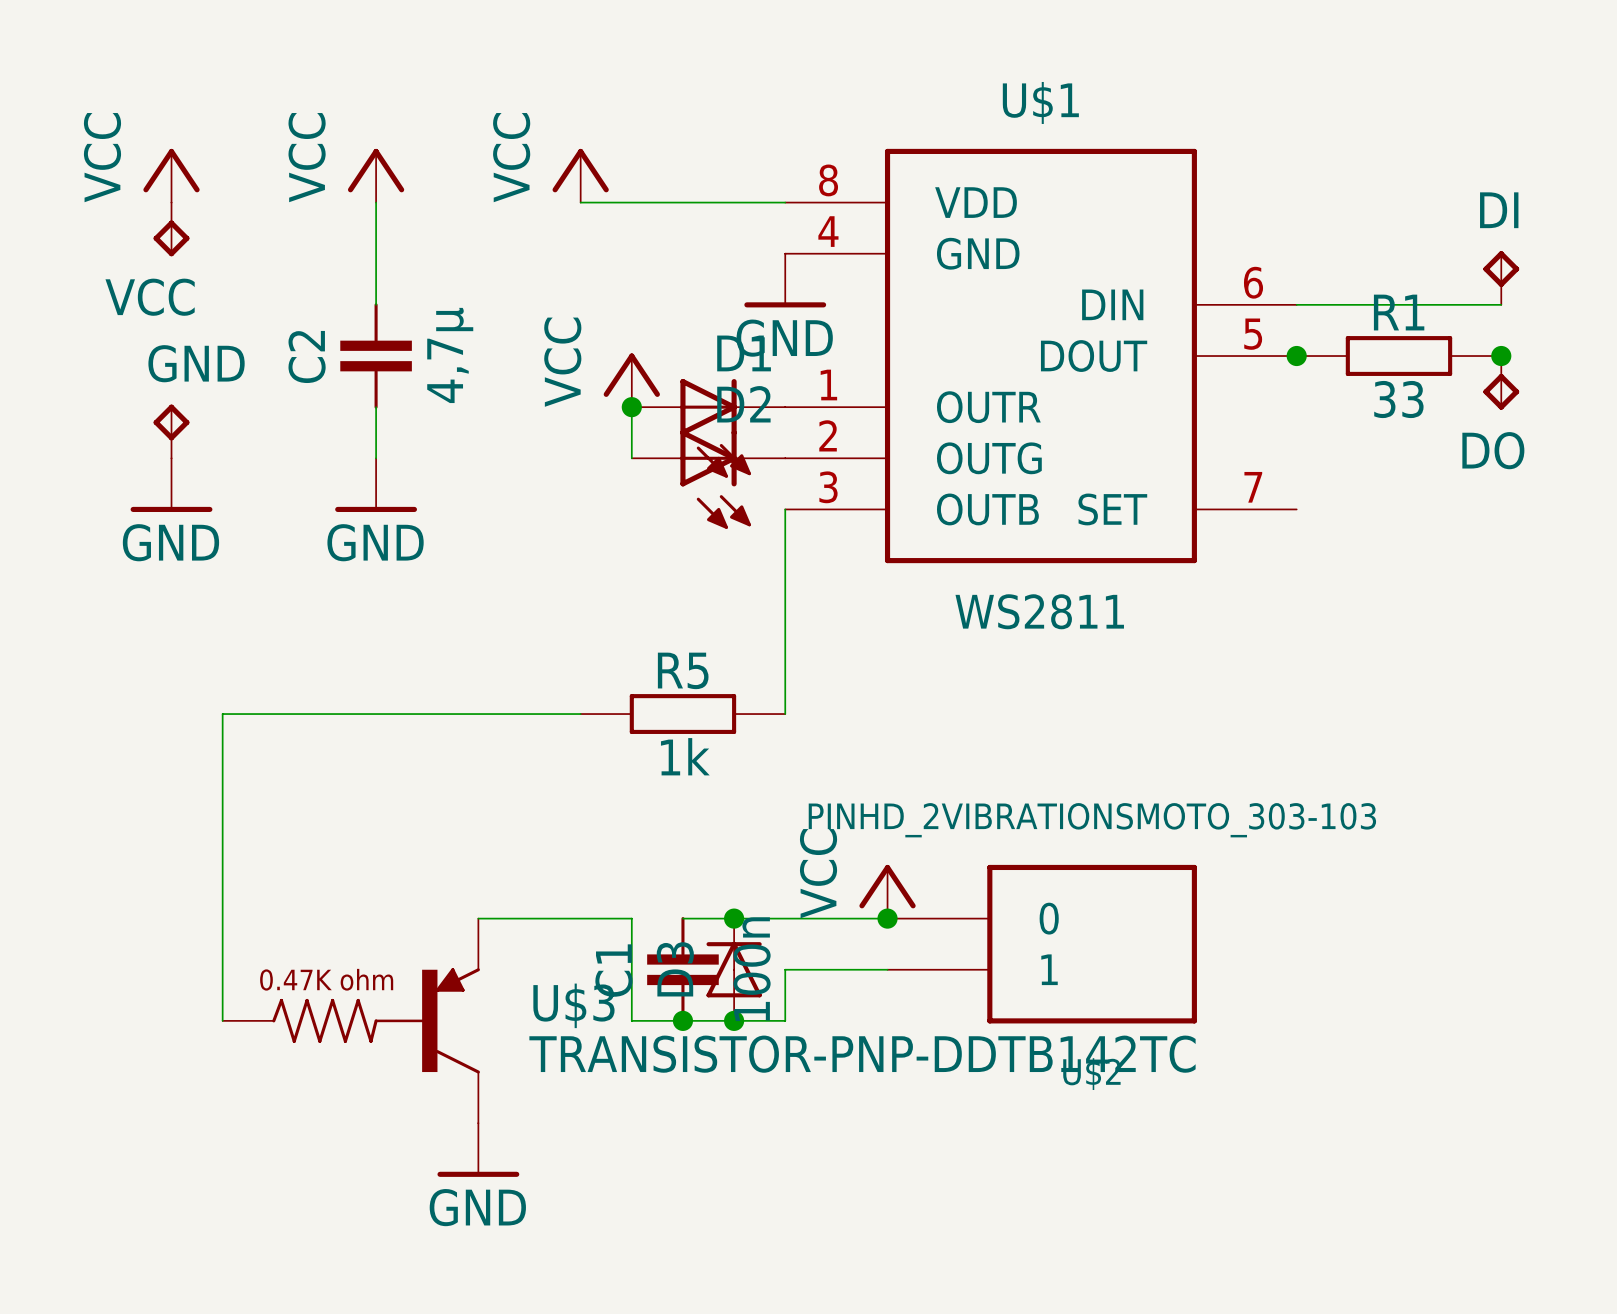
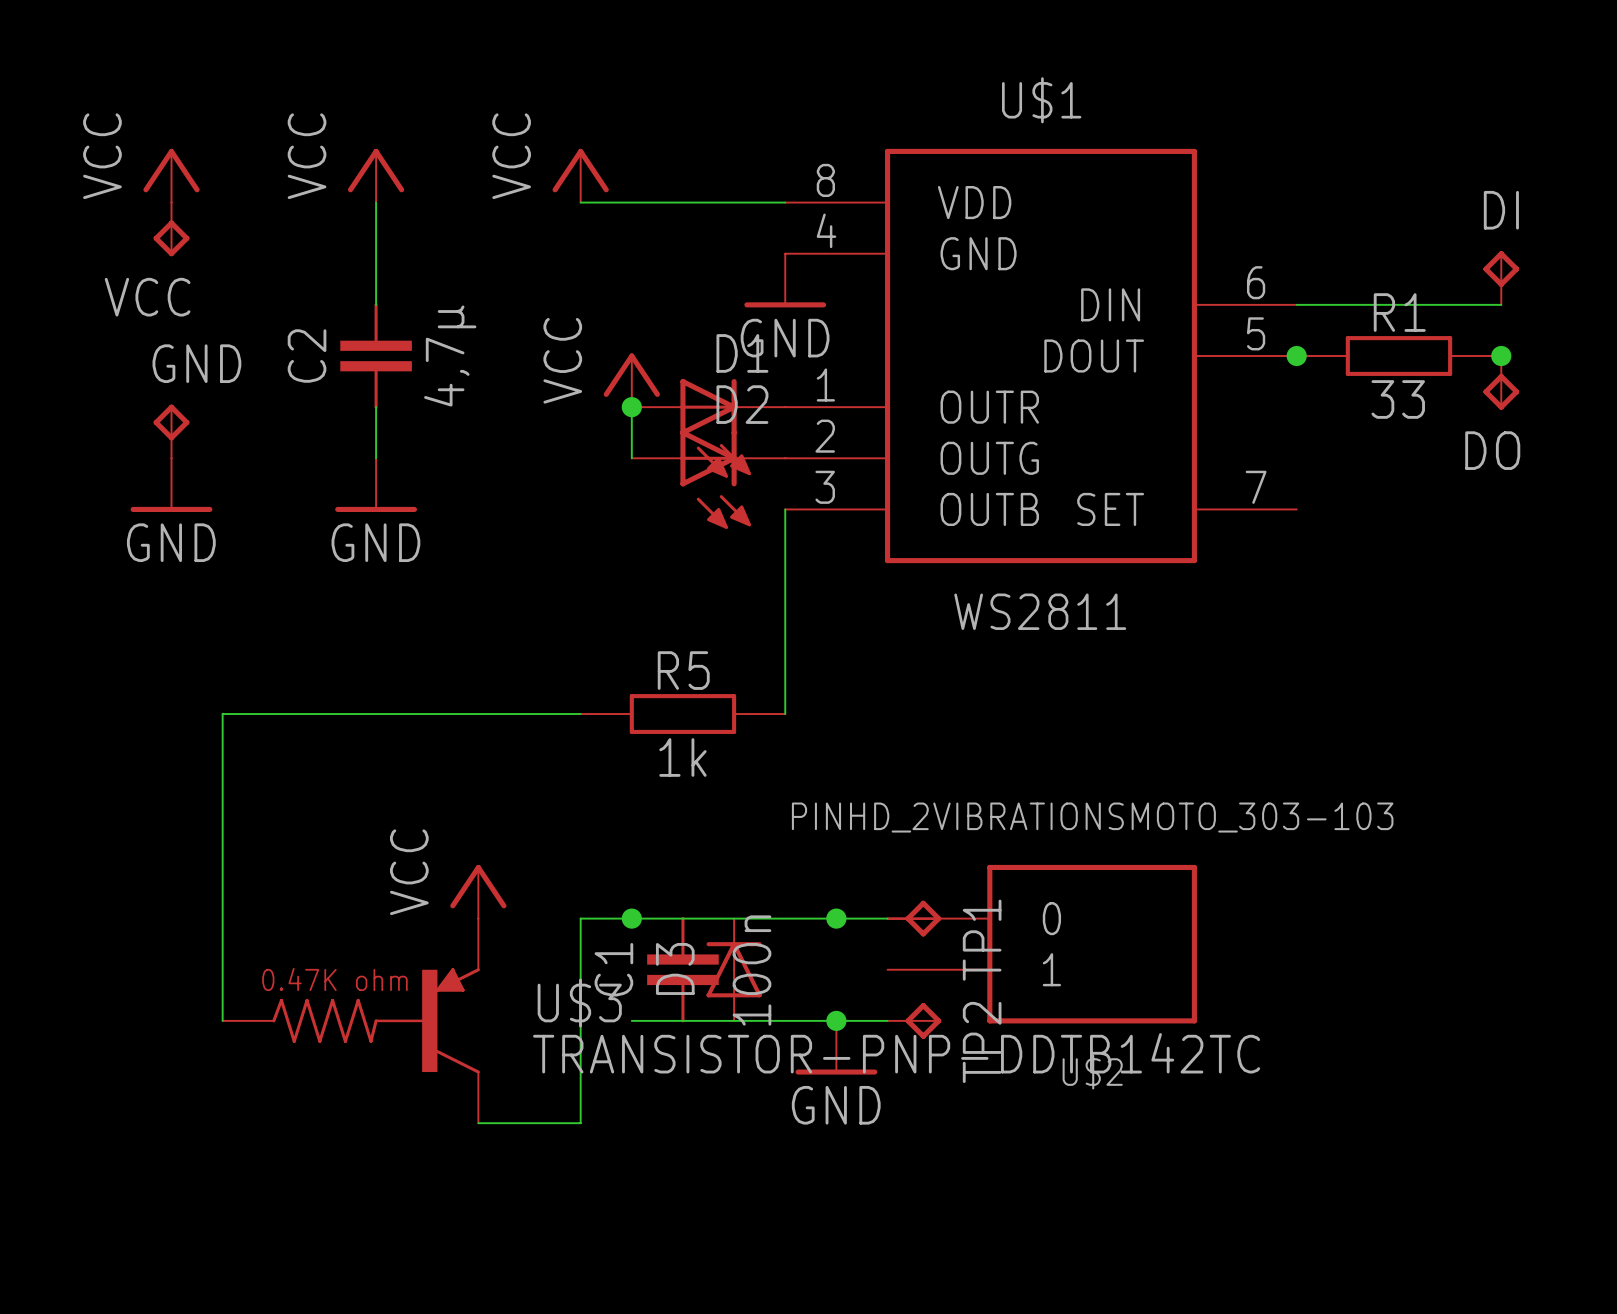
power symbol position: VCC (887, 891) -> VCC (478, 891)
wire: (478, 918) (580, 918) -> (478, 1123) (580, 1123) (580, 918)
wire: (631, 918) (631, 1020) -> (631, 918) (682, 918)
junction: none -> (631, 918)
junction: (734, 918) -> none
junction: none -> (836, 918)
junction: (887, 918) -> none
TP1: none -> (914, 918)
wire: (887, 969) (785, 969) (785, 1020) -> (887, 1020) (785, 1020)
junction: (682, 1020) -> none
junction: (734, 1020) -> none
junction: none -> (836, 1020)
TP2: none -> (914, 1020)
power symbol position: GND (478, 1150) -> GND (836, 1047)

